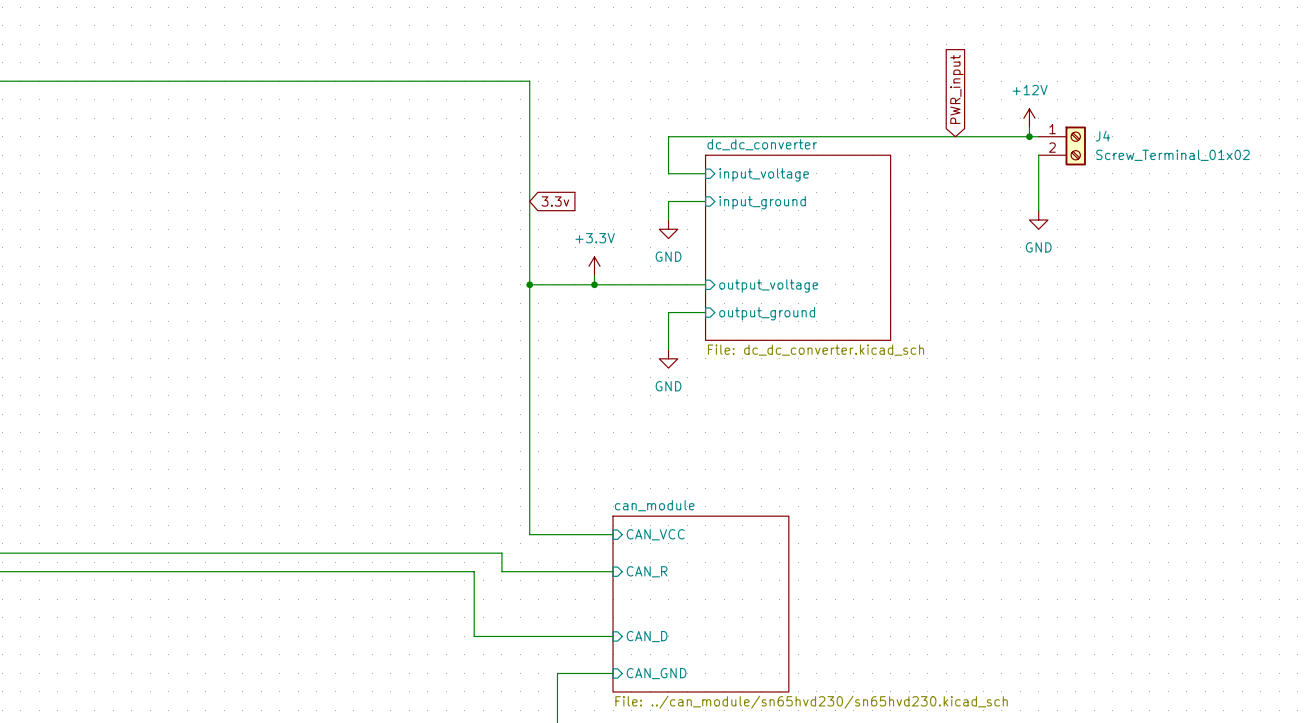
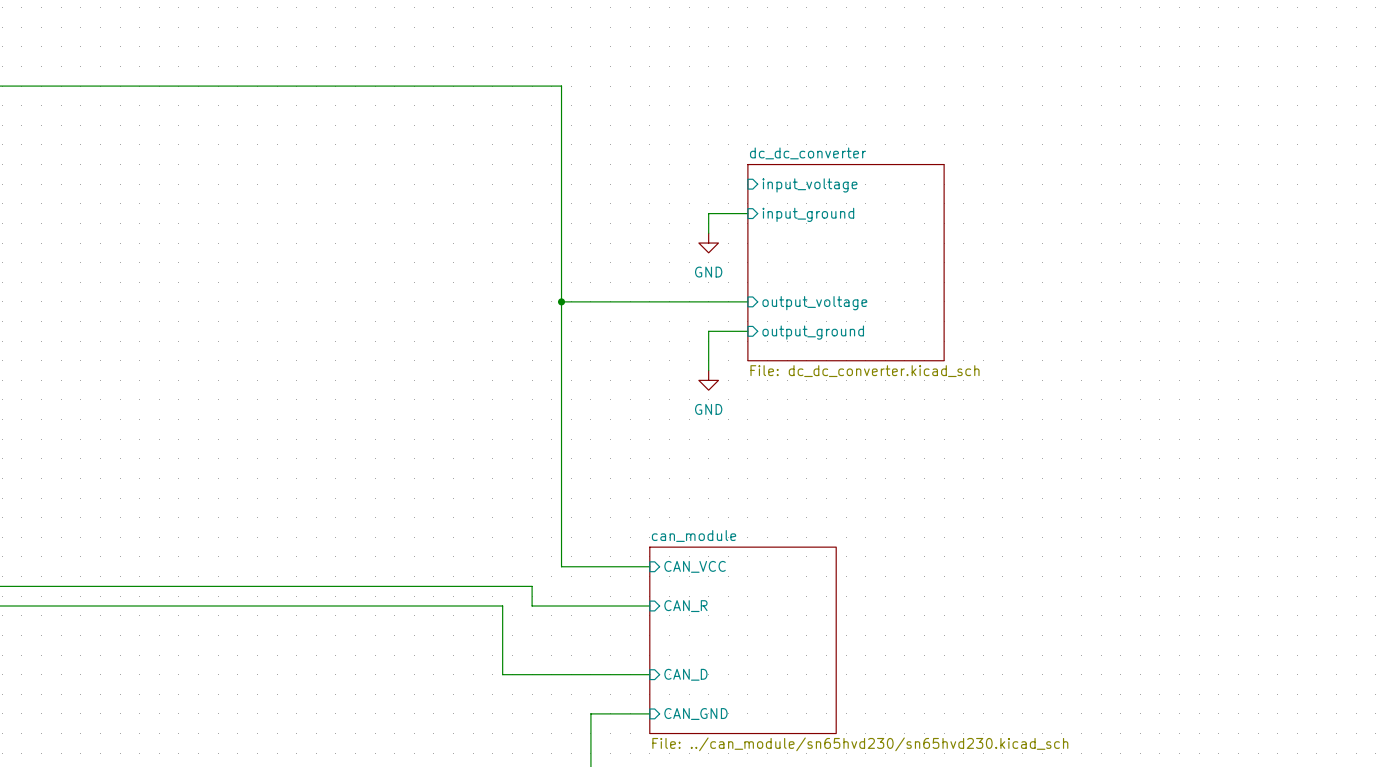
global label: PWR_input (956, 89) -> none
power symbol: +12V (1029, 118) -> none
wire: (1029, 127) (1029, 136) -> none
junction: (1029, 136) -> none
wire: (1038, 136) (668, 136) (668, 173) (705, 173) -> none
J4: Screw_Terminal_01x02 (1062, 145) -> none
wire: (1038, 155) (1038, 210) -> none
global label: 3.3v (555, 201) -> none
power symbol: GND (1038, 220) -> none
power symbol: +3.3V (594, 266) -> none
wire: (594, 275) (594, 284) -> none
junction: (594, 284) -> none

